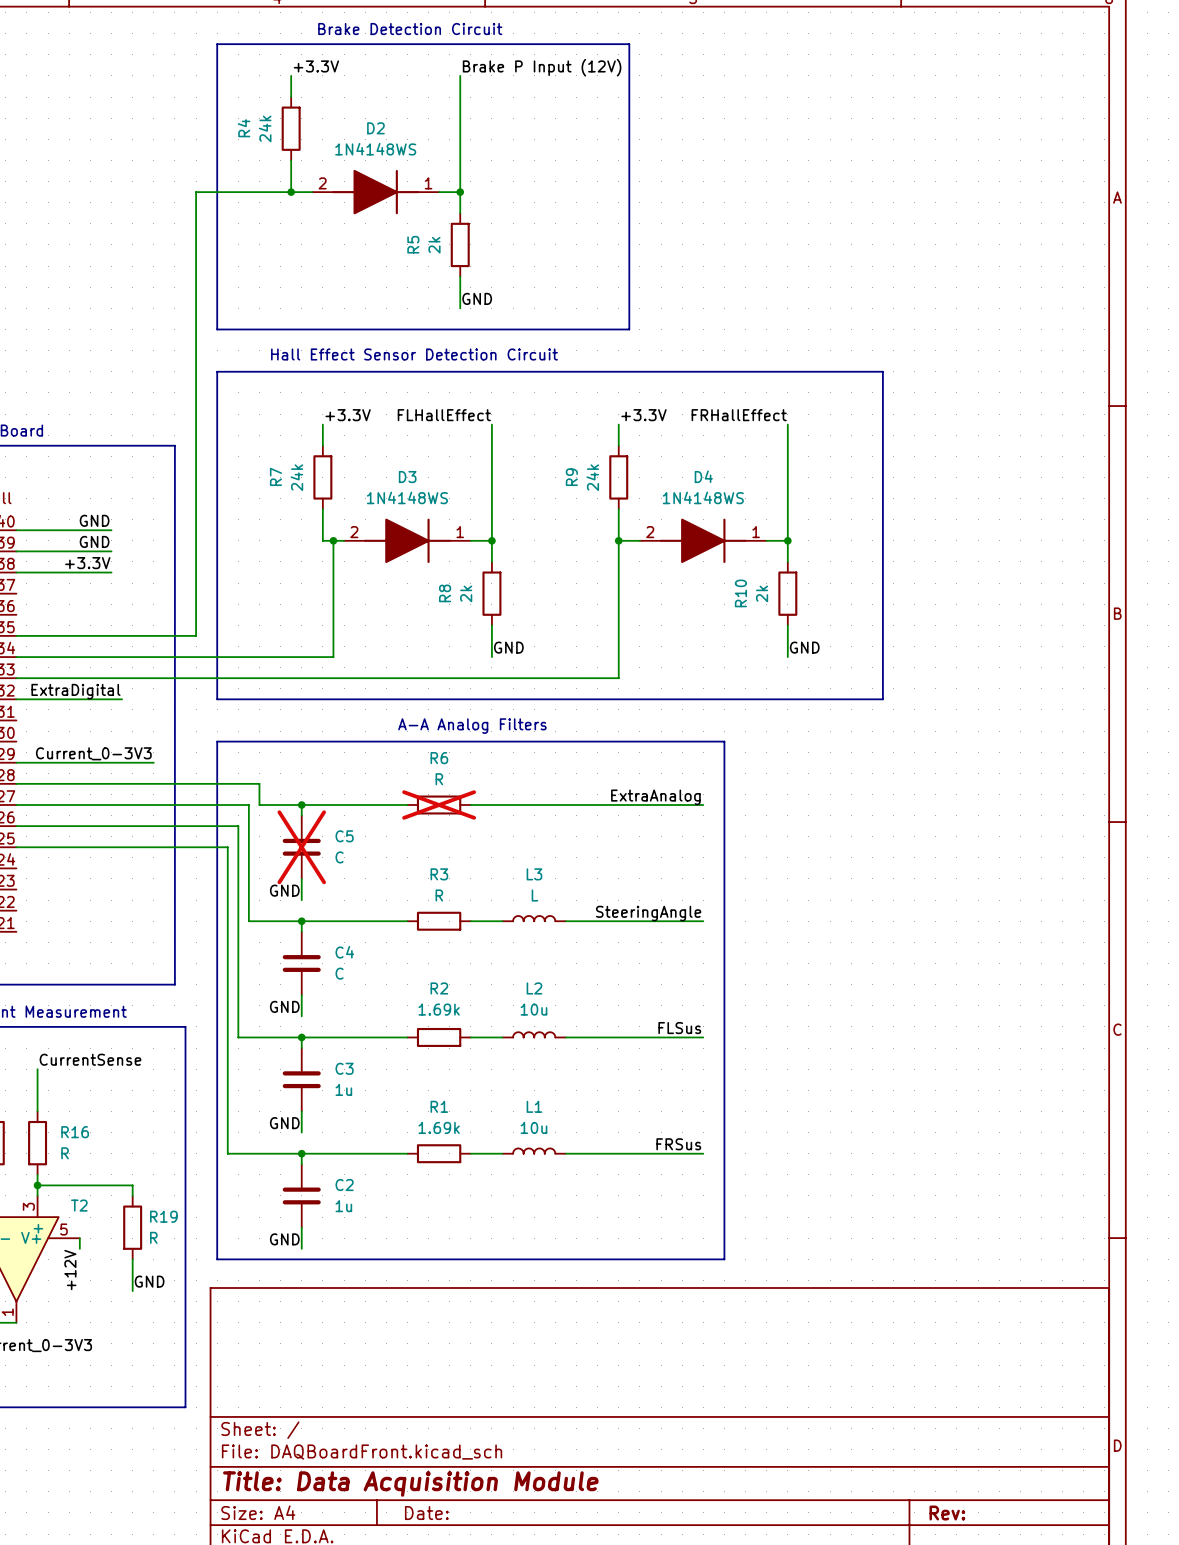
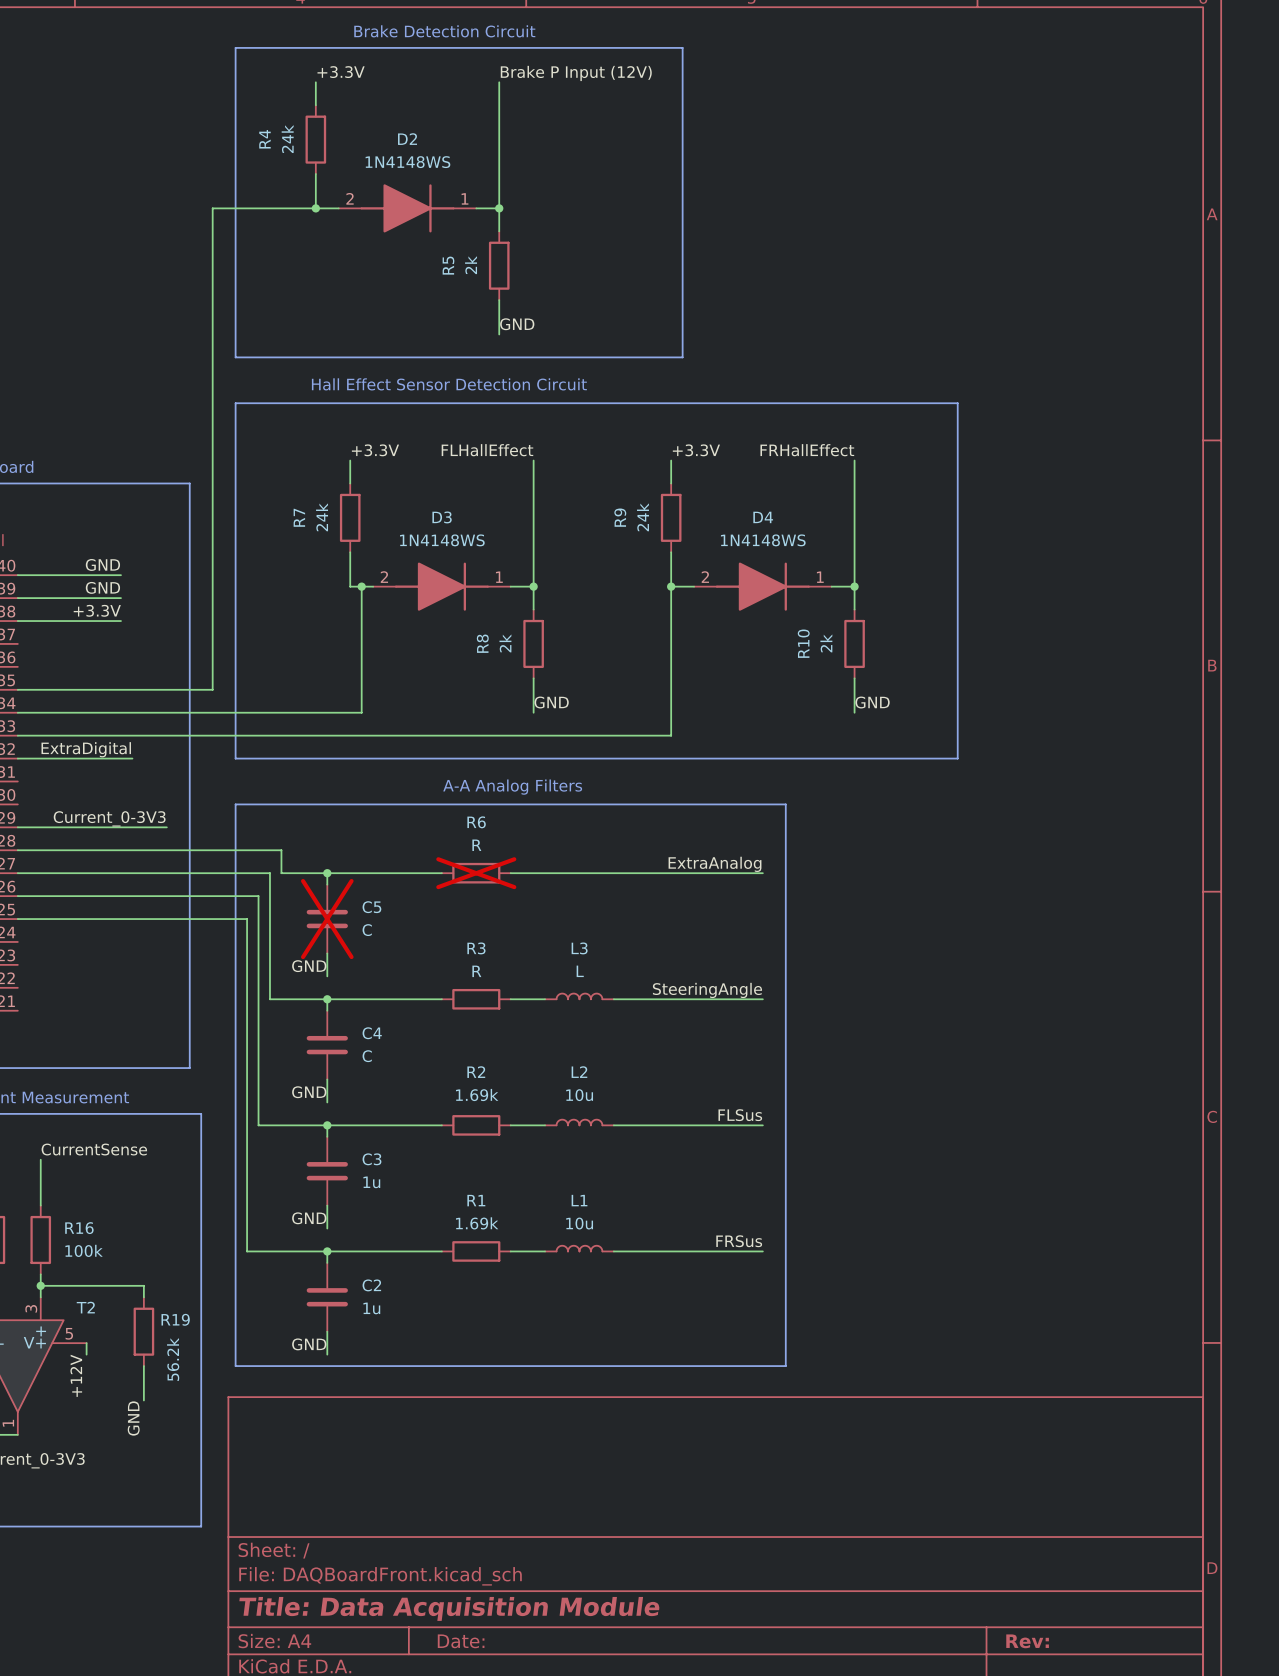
R16 value: R (65, 1153) -> 100k (84, 1250)
R19 value: R (153, 1237) -> 56.2k (173, 1359)
label rotation: 0° (149, 1281) -> 90° counterclockwise (133, 1418)
label position: GND (149, 1281) -> GND (133, 1418)

